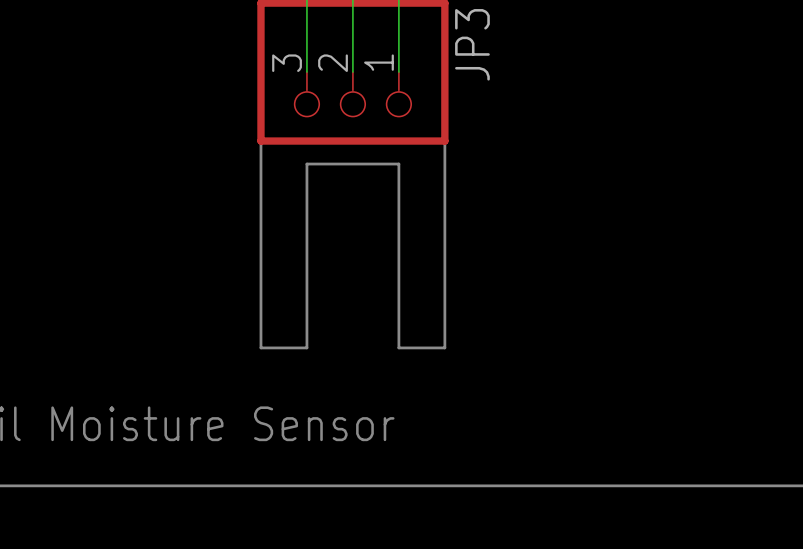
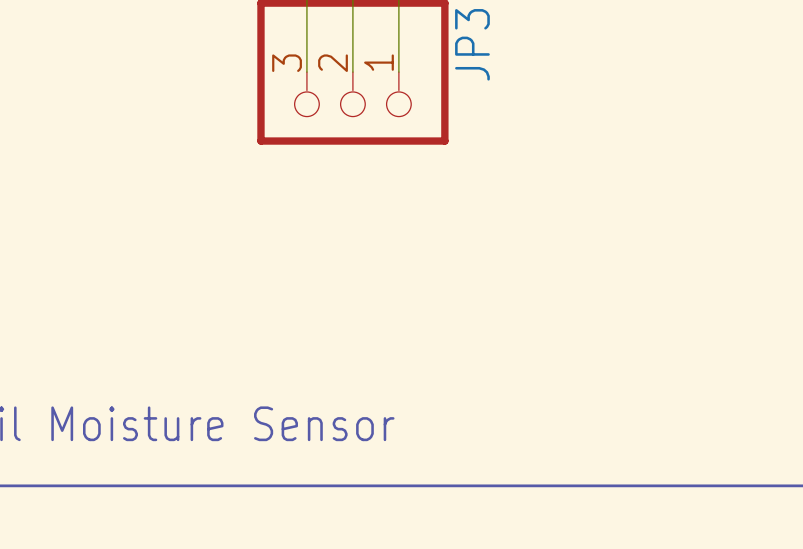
line: (260, 118) (260, 347) (306, 347) (306, 164) (398, 164) (398, 347) (444, 347) (444, 118) -> none

